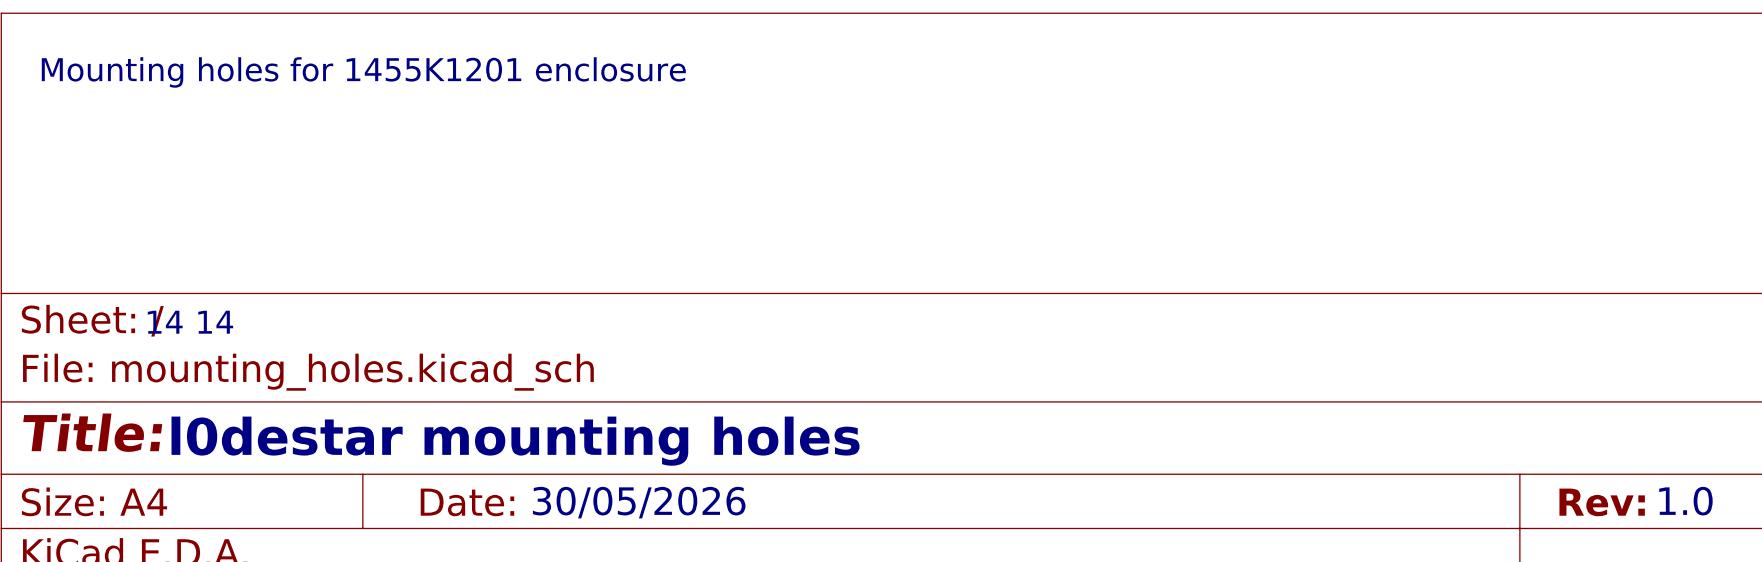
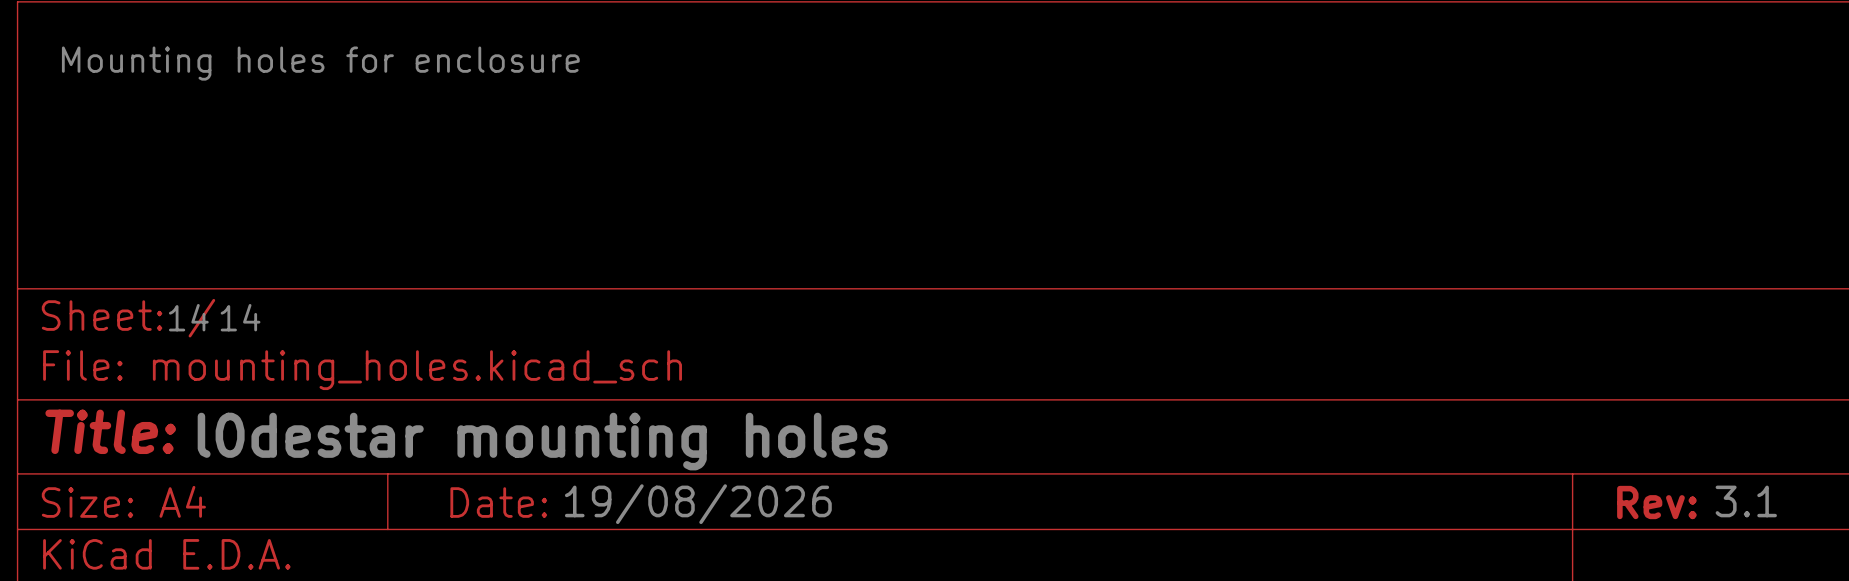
text: Mounting holes for 1455K1201 enclosure (363, 72) -> Mounting holes for enclosure (320, 63)
text: 1.0 (1685, 501) -> 3.1 (1746, 501)
text: 30/05/2026 (639, 502) -> 19/08/2026 (698, 504)

